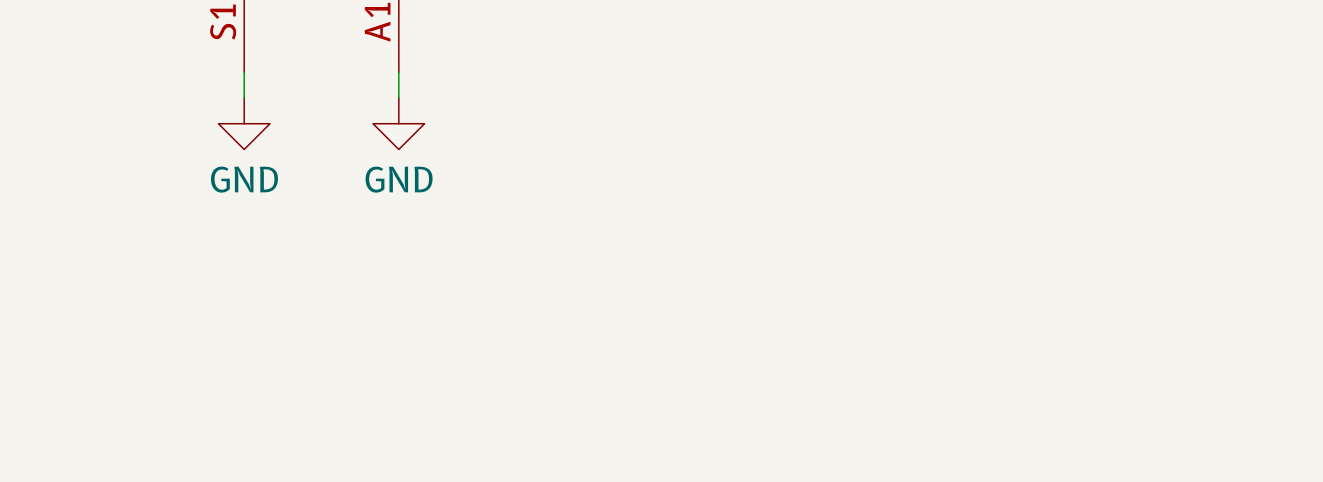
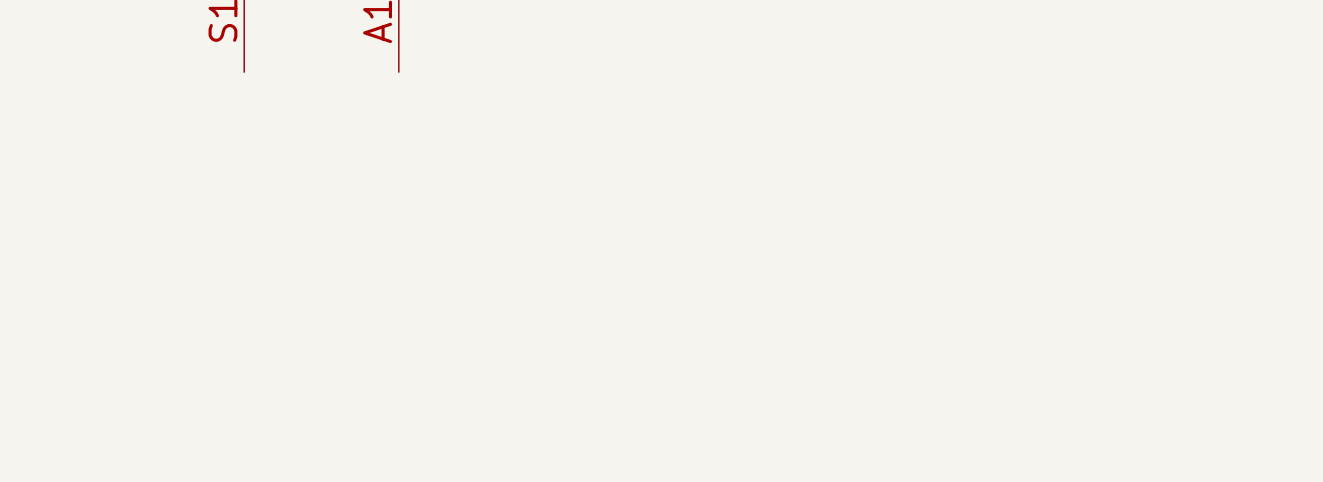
wire: (244, 72) (244, 97) -> none
wire: (398, 72) (398, 97) -> none
power symbol: GND (244, 123) -> none
power symbol: GND (398, 123) -> none

